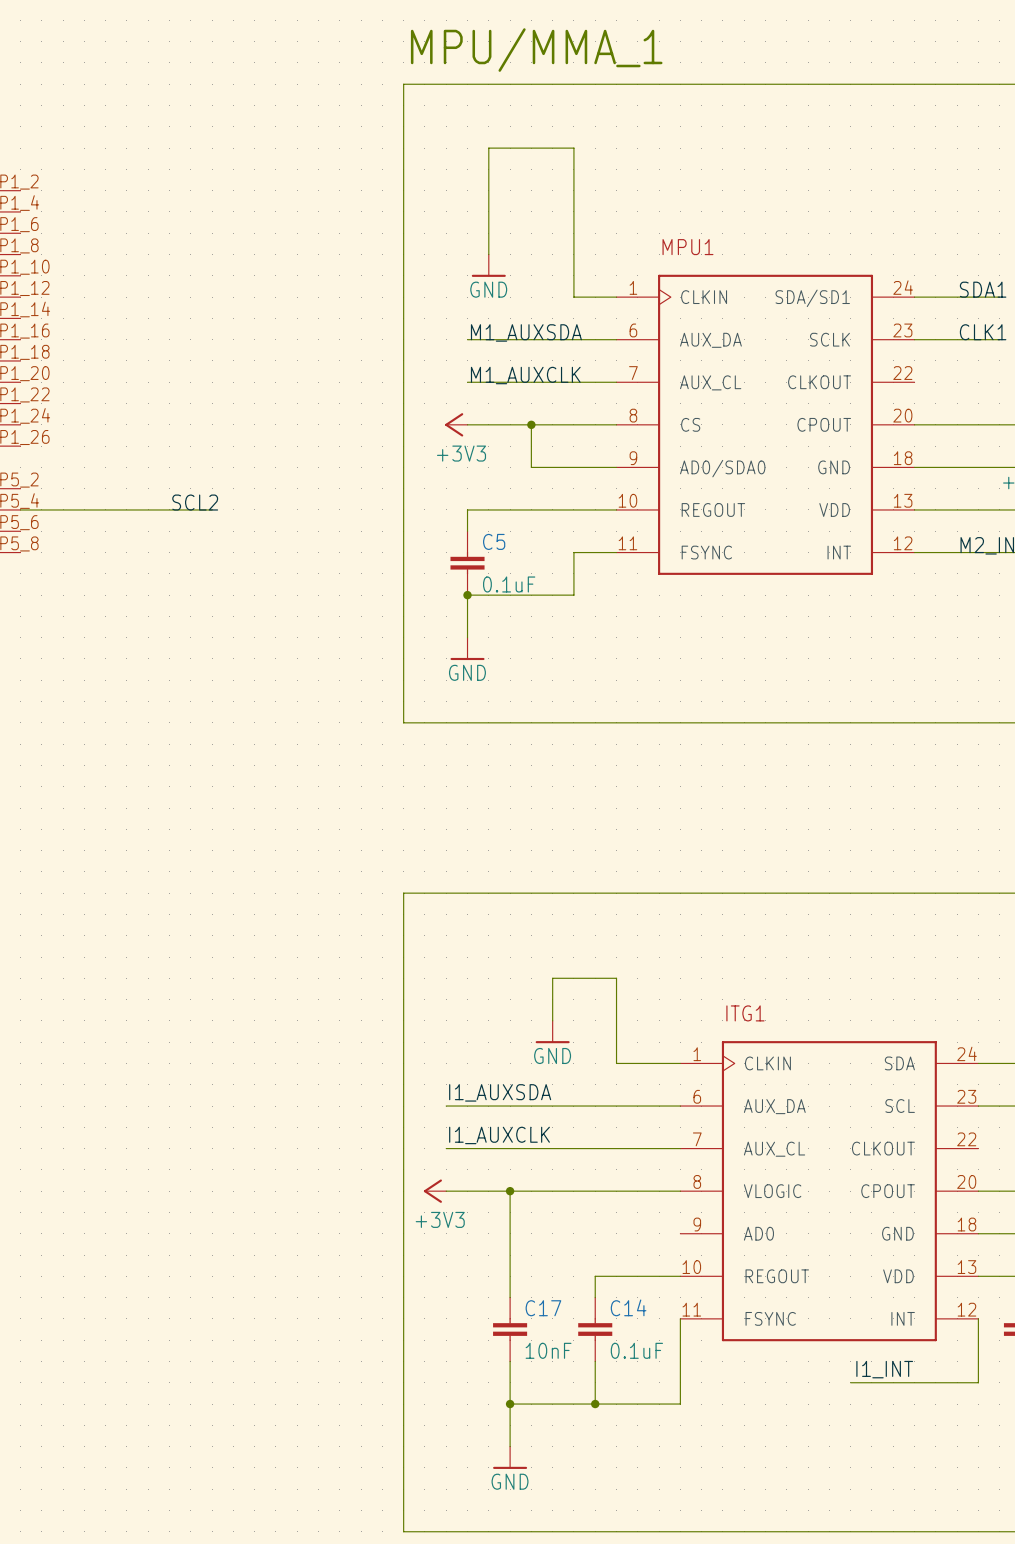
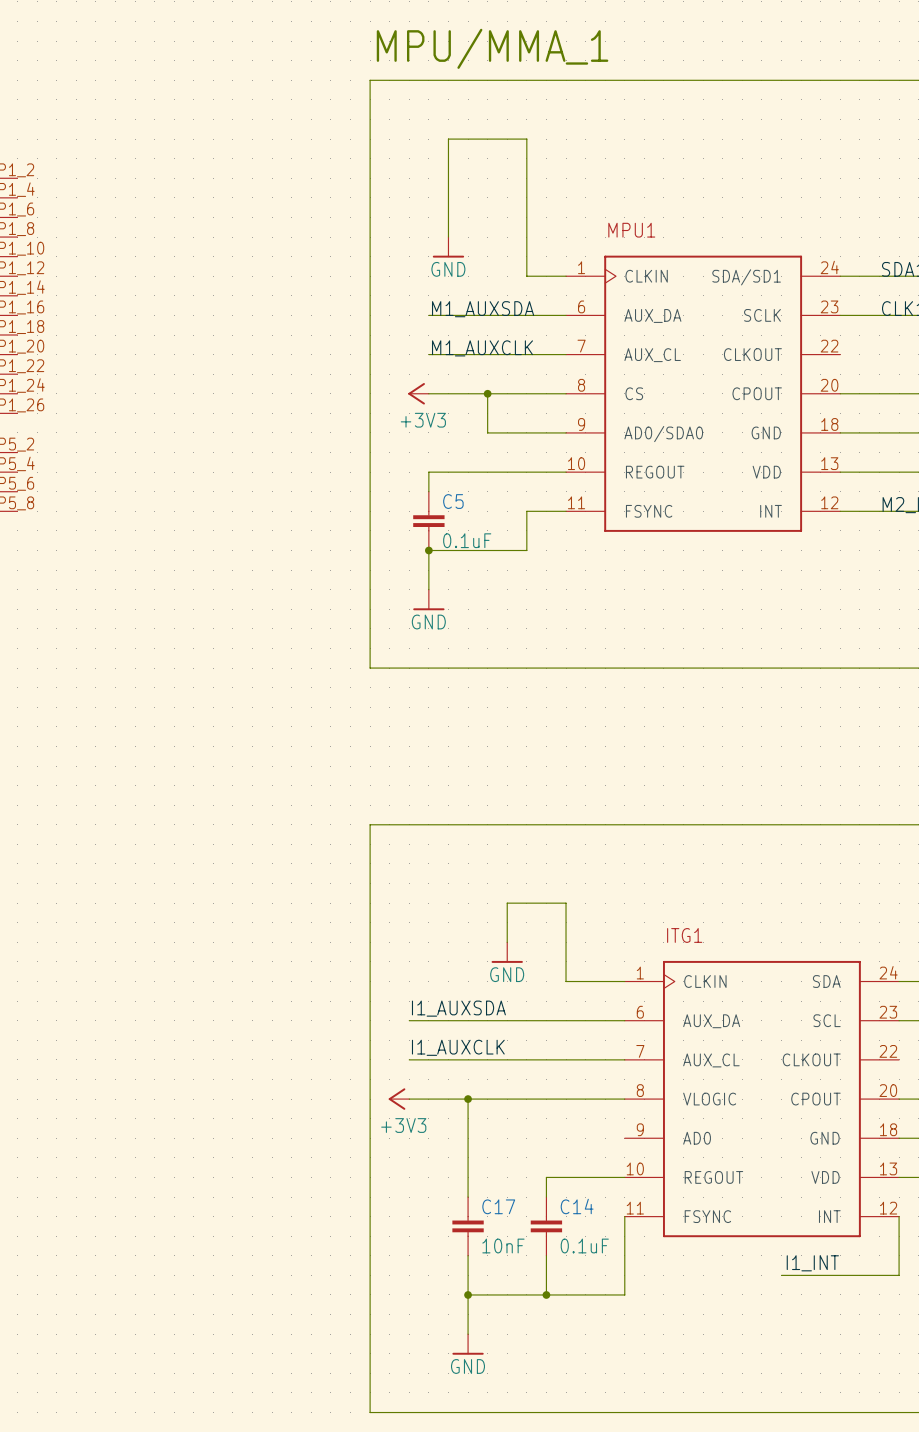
label: SCL2 (195, 502) -> none
wire: (20, 509) (212, 509) -> none

